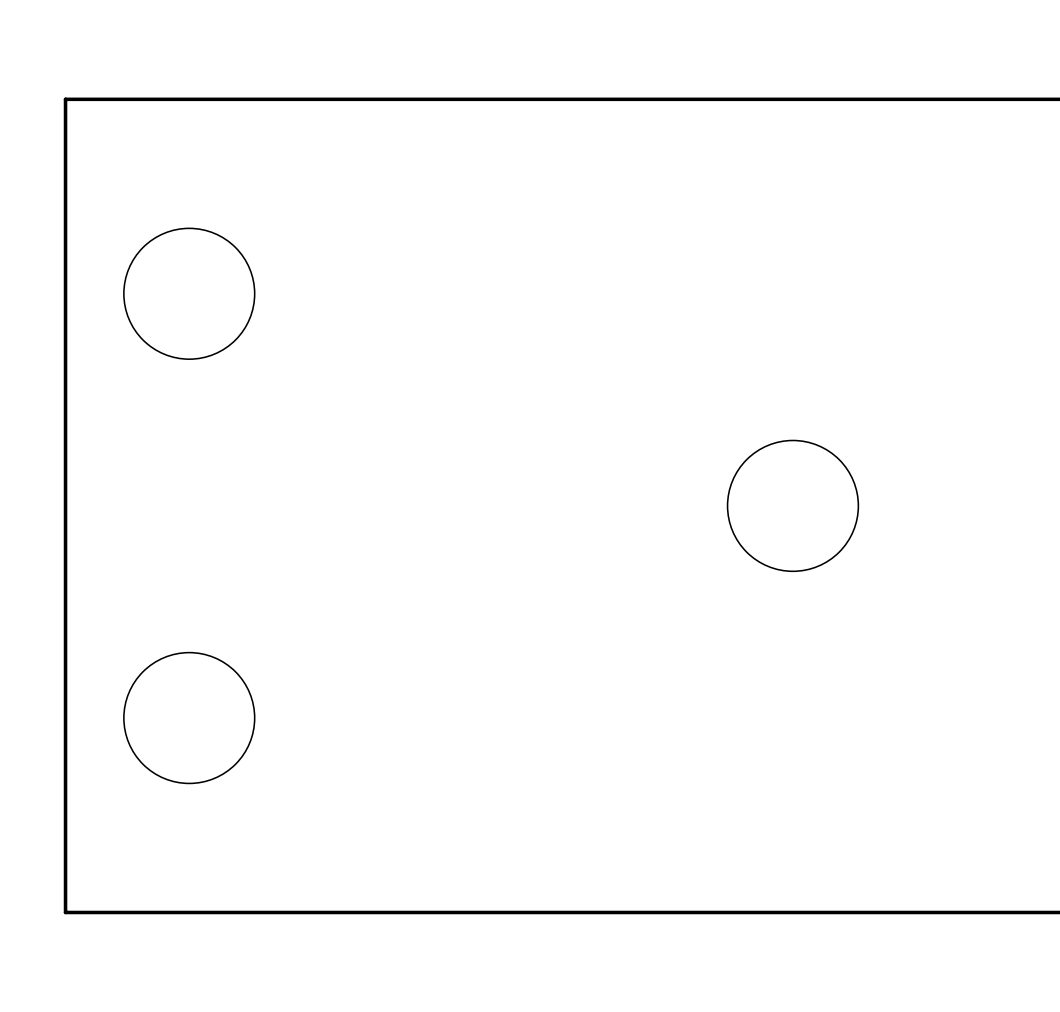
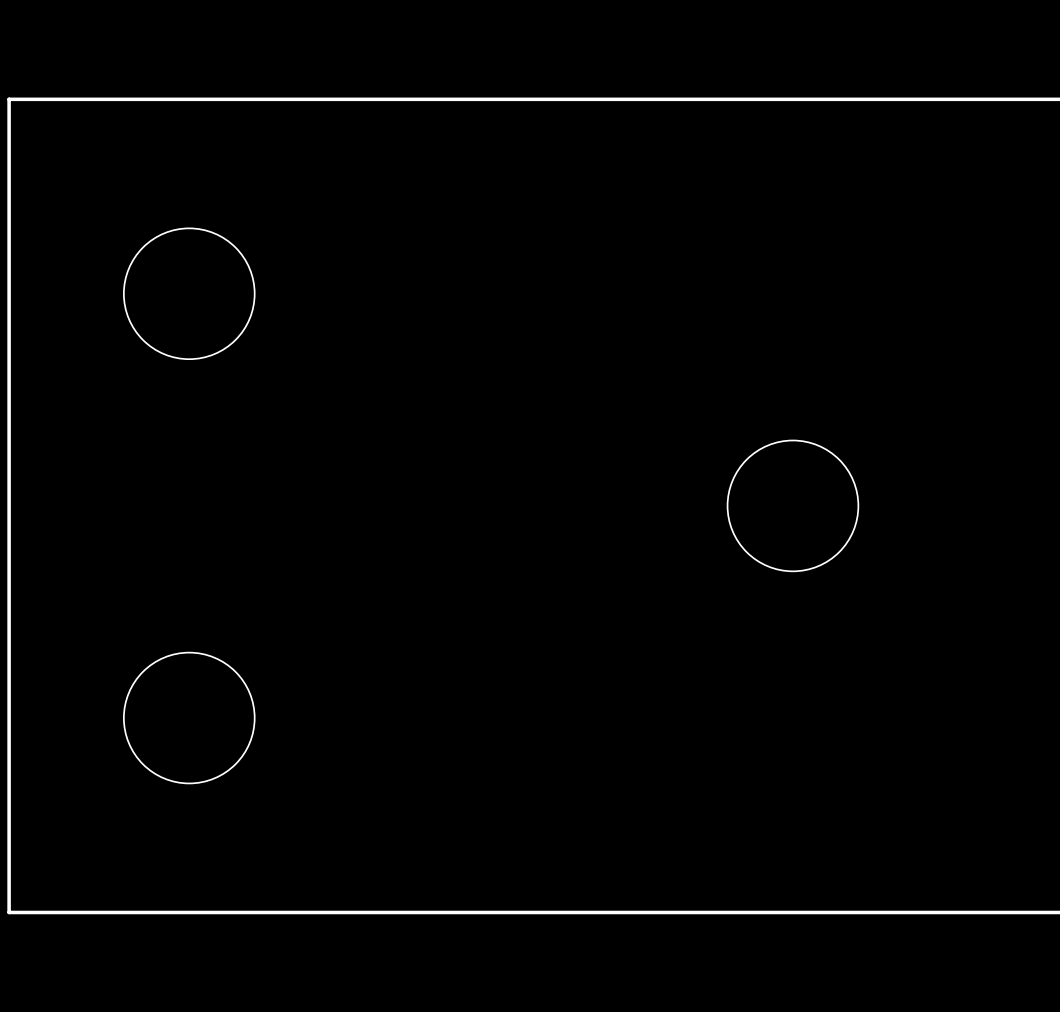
board edge: (65, 99) (65, 912) -> (65, 99) (9, 99) (9, 912) (65, 912)

